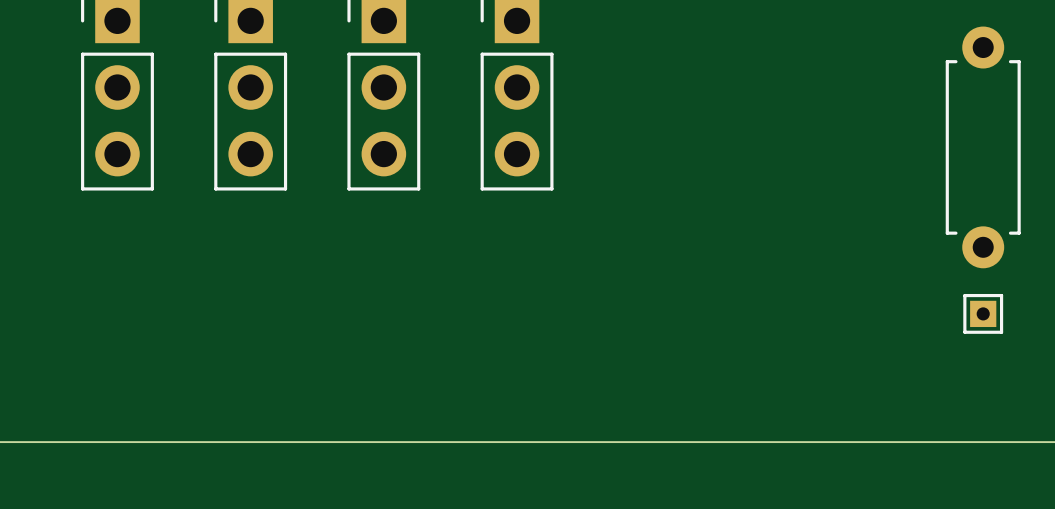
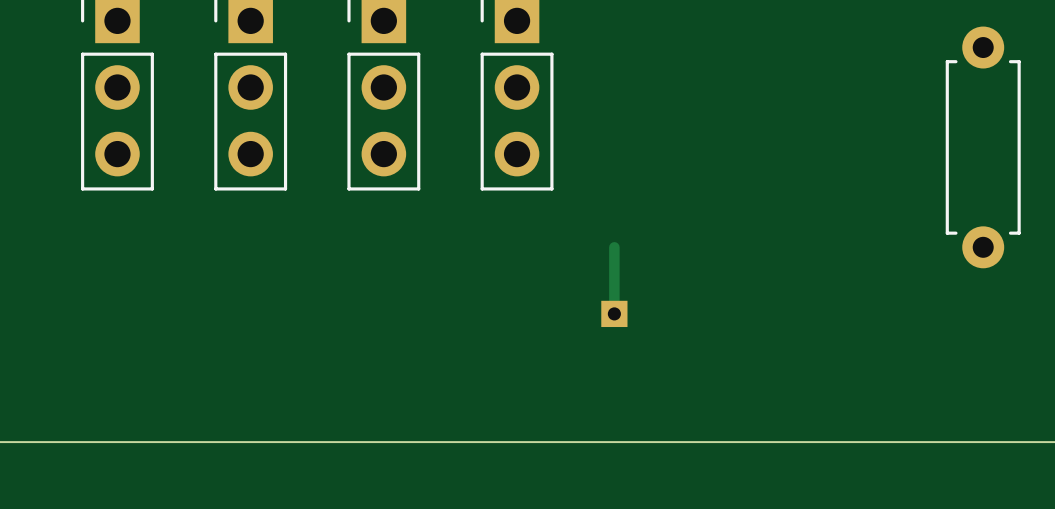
track: none -> (614, 247) (614, 313)
part side: bottom (983, 313) -> top (614, 313)

